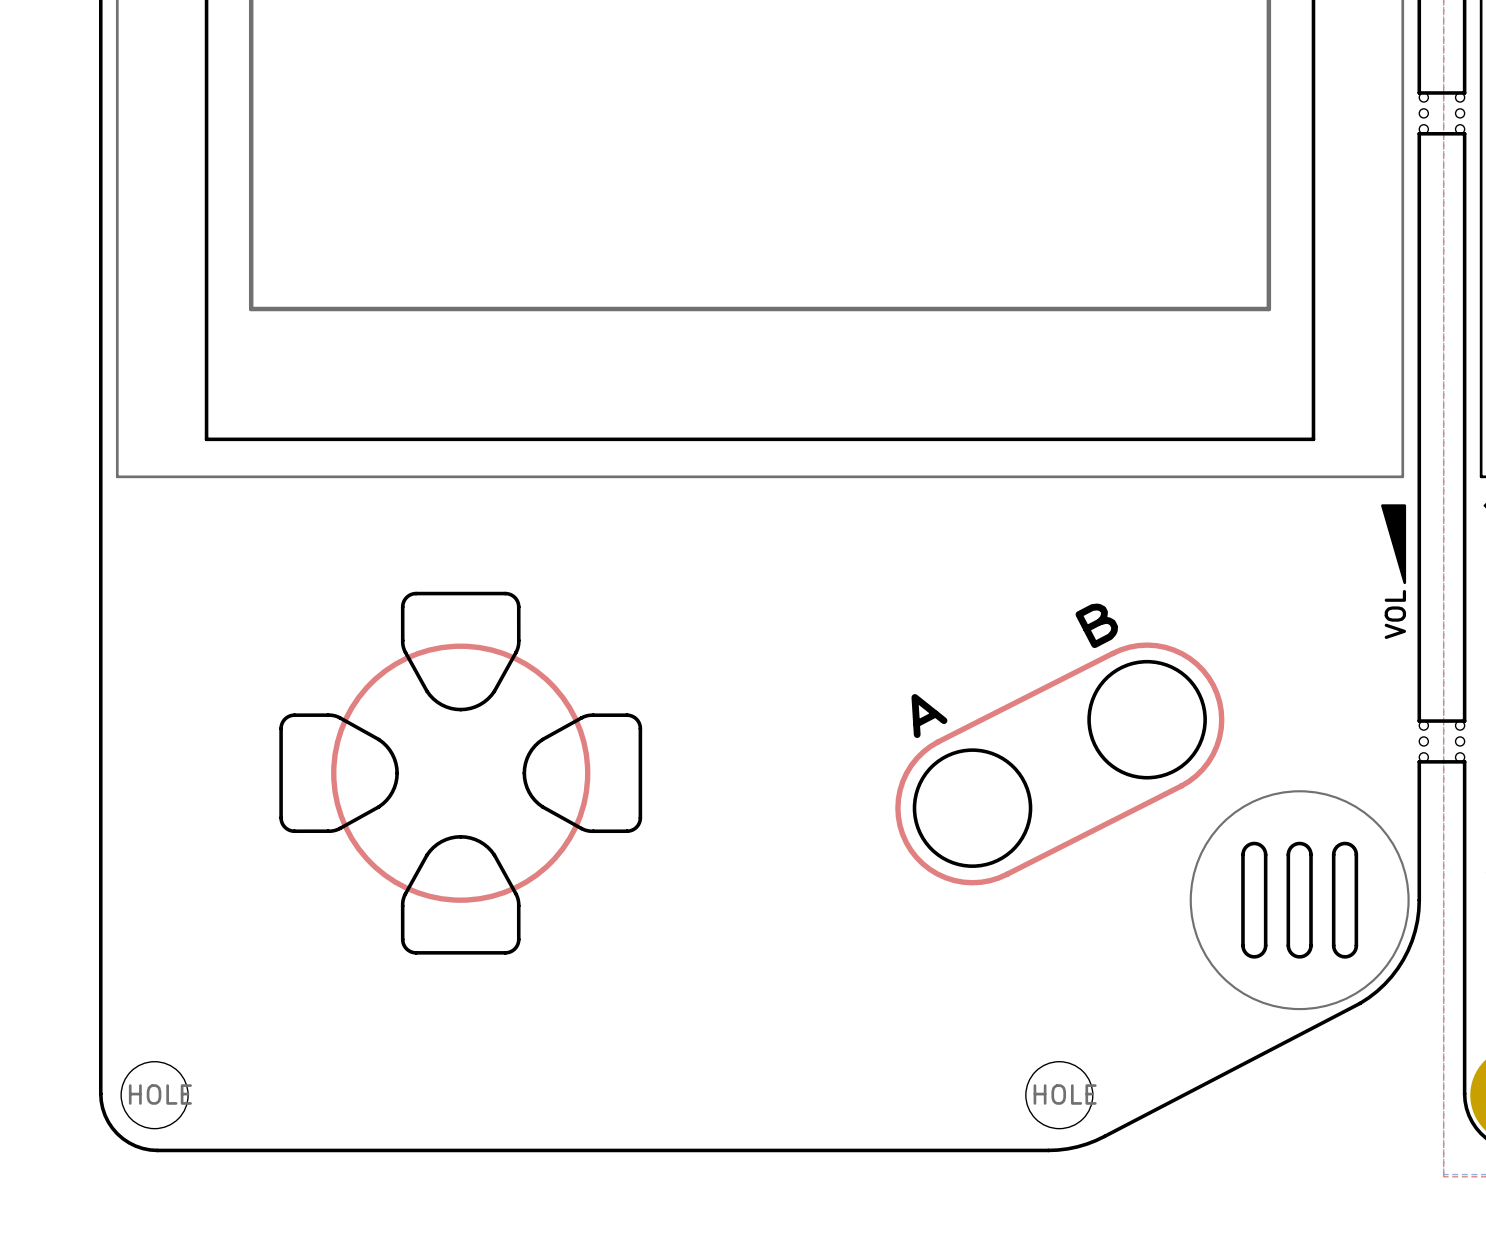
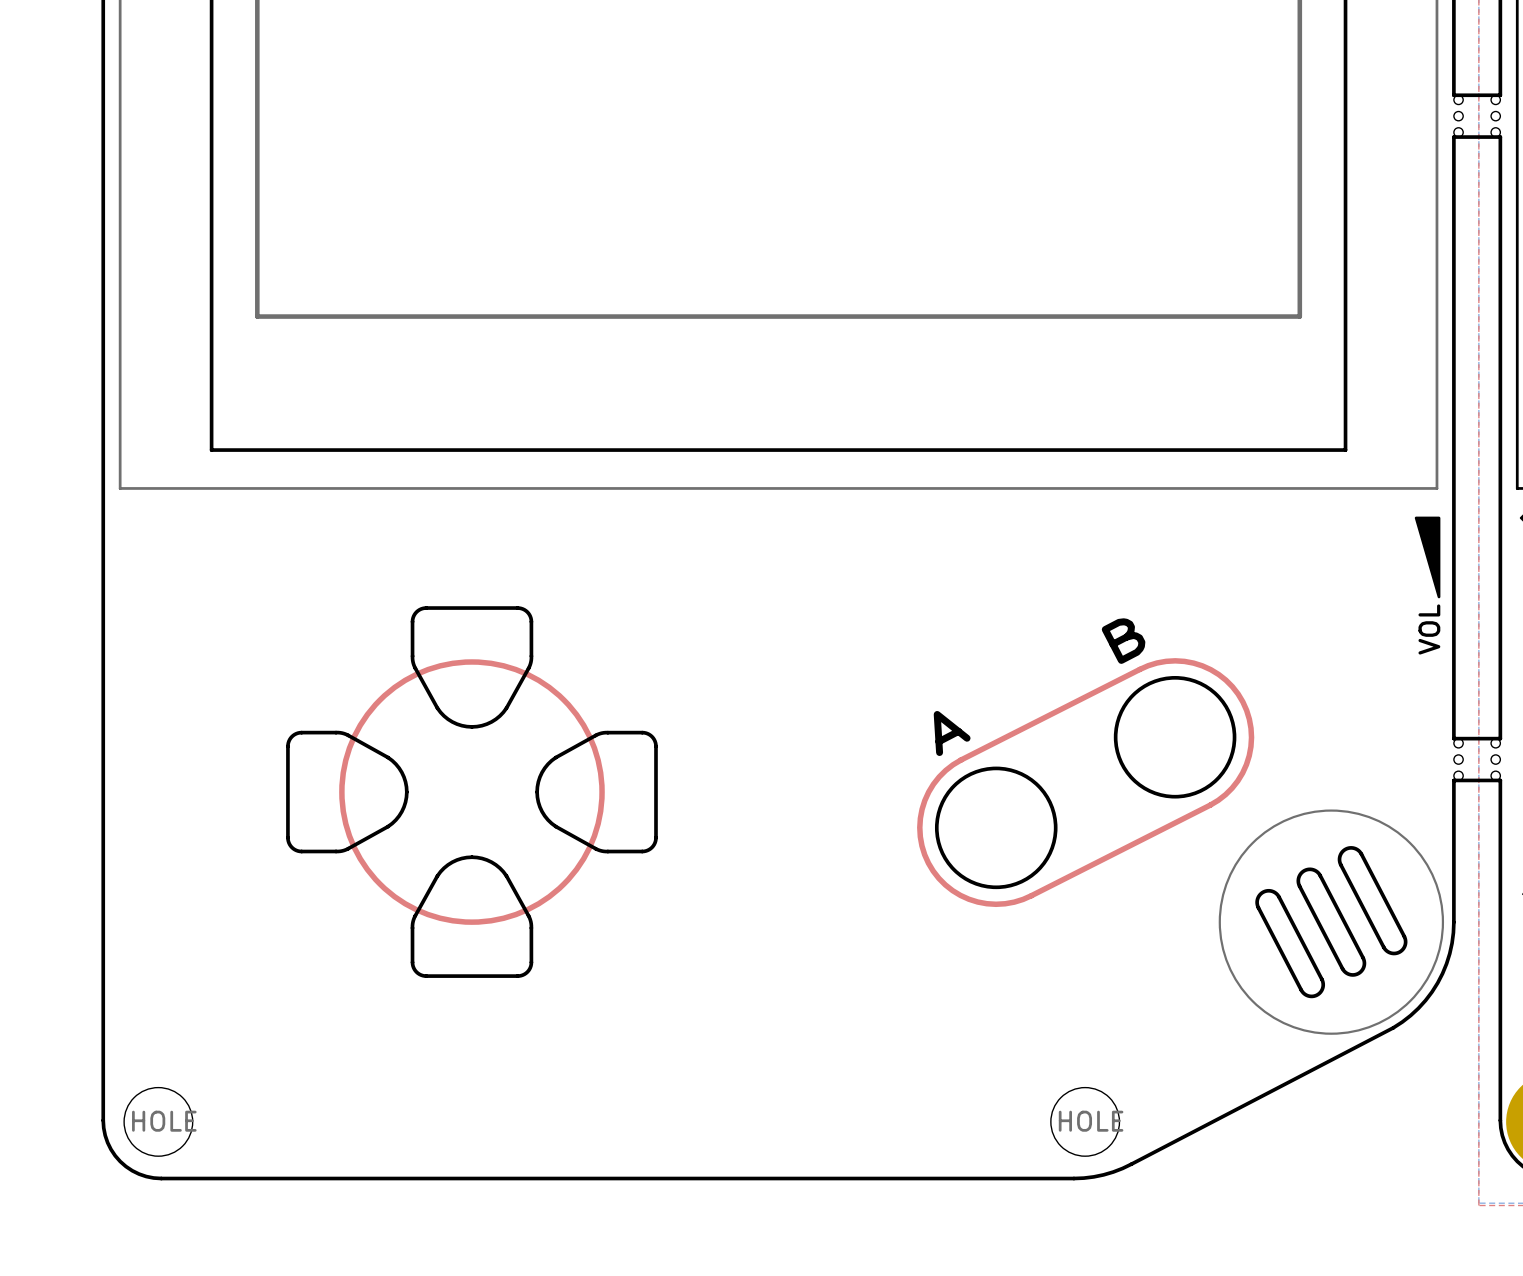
drawing shape: [1189, 790, 1410, 1011] -> [1218, 809, 1445, 1035]

